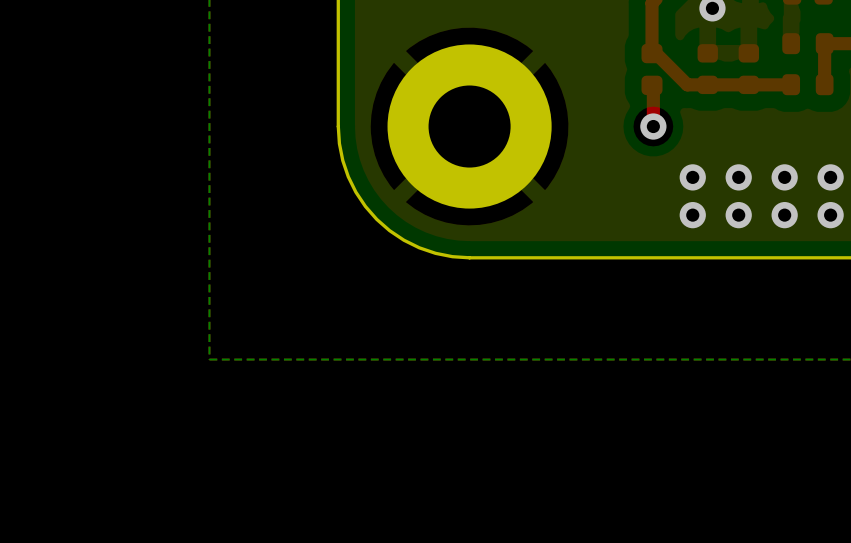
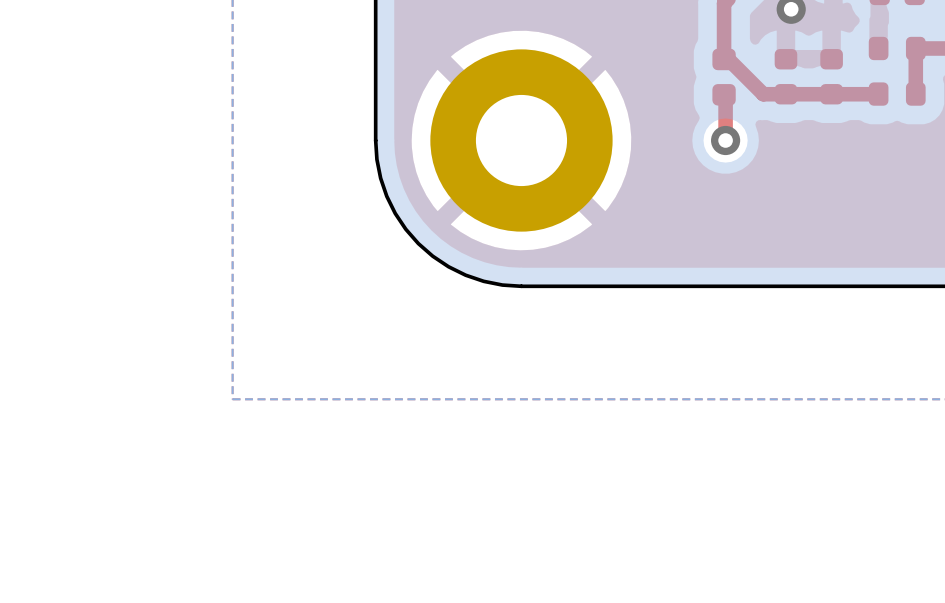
via: (692, 177) -> none
via: (738, 177) -> none
via: (784, 177) -> none
via: (830, 177) -> none
via: (692, 215) -> none
via: (738, 215) -> none
via: (784, 215) -> none
via: (830, 215) -> none

